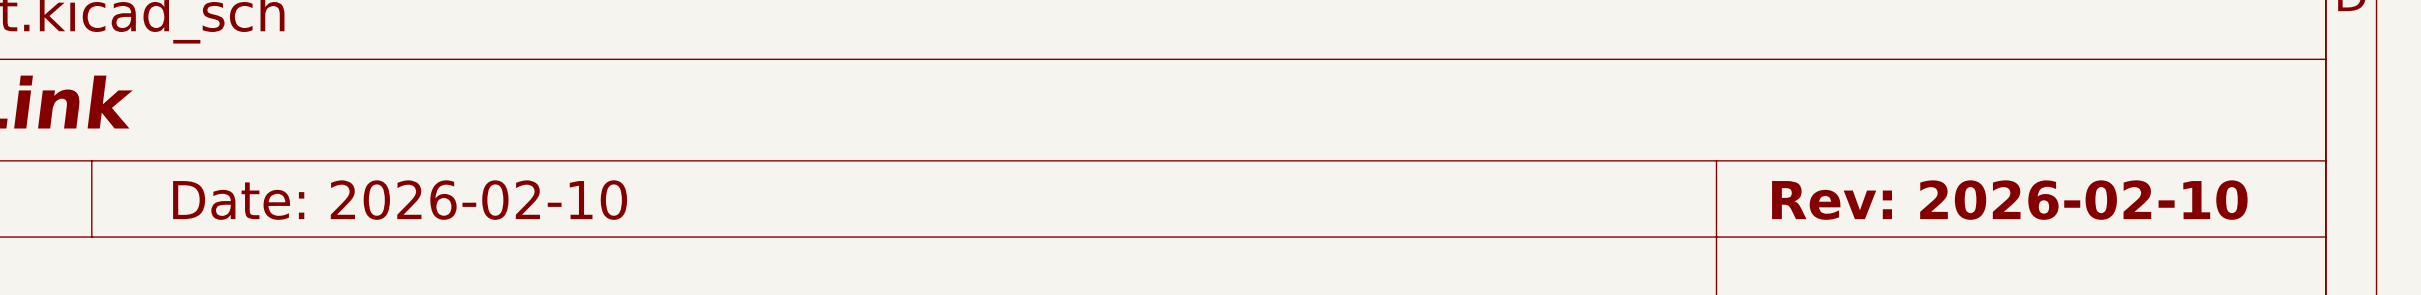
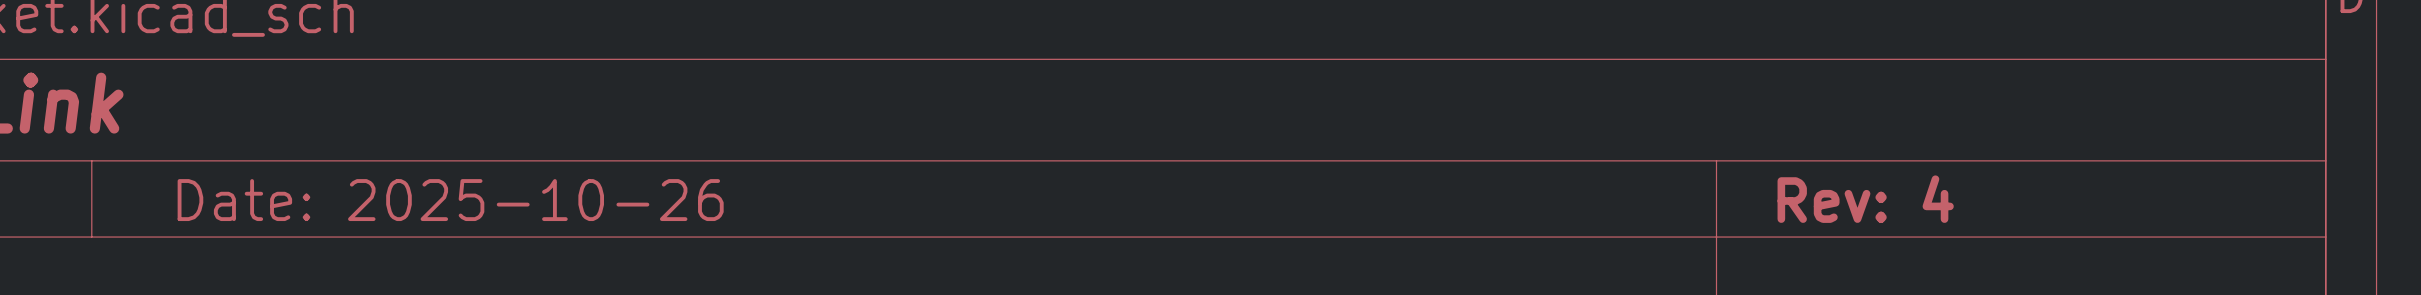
title block: Date: 2026-02-10 (400, 200) -> Date: 2025-10-26 (450, 200)
title block: Rev: 2026-02-10 (2009, 200) -> Rev: 4 (1865, 199)

